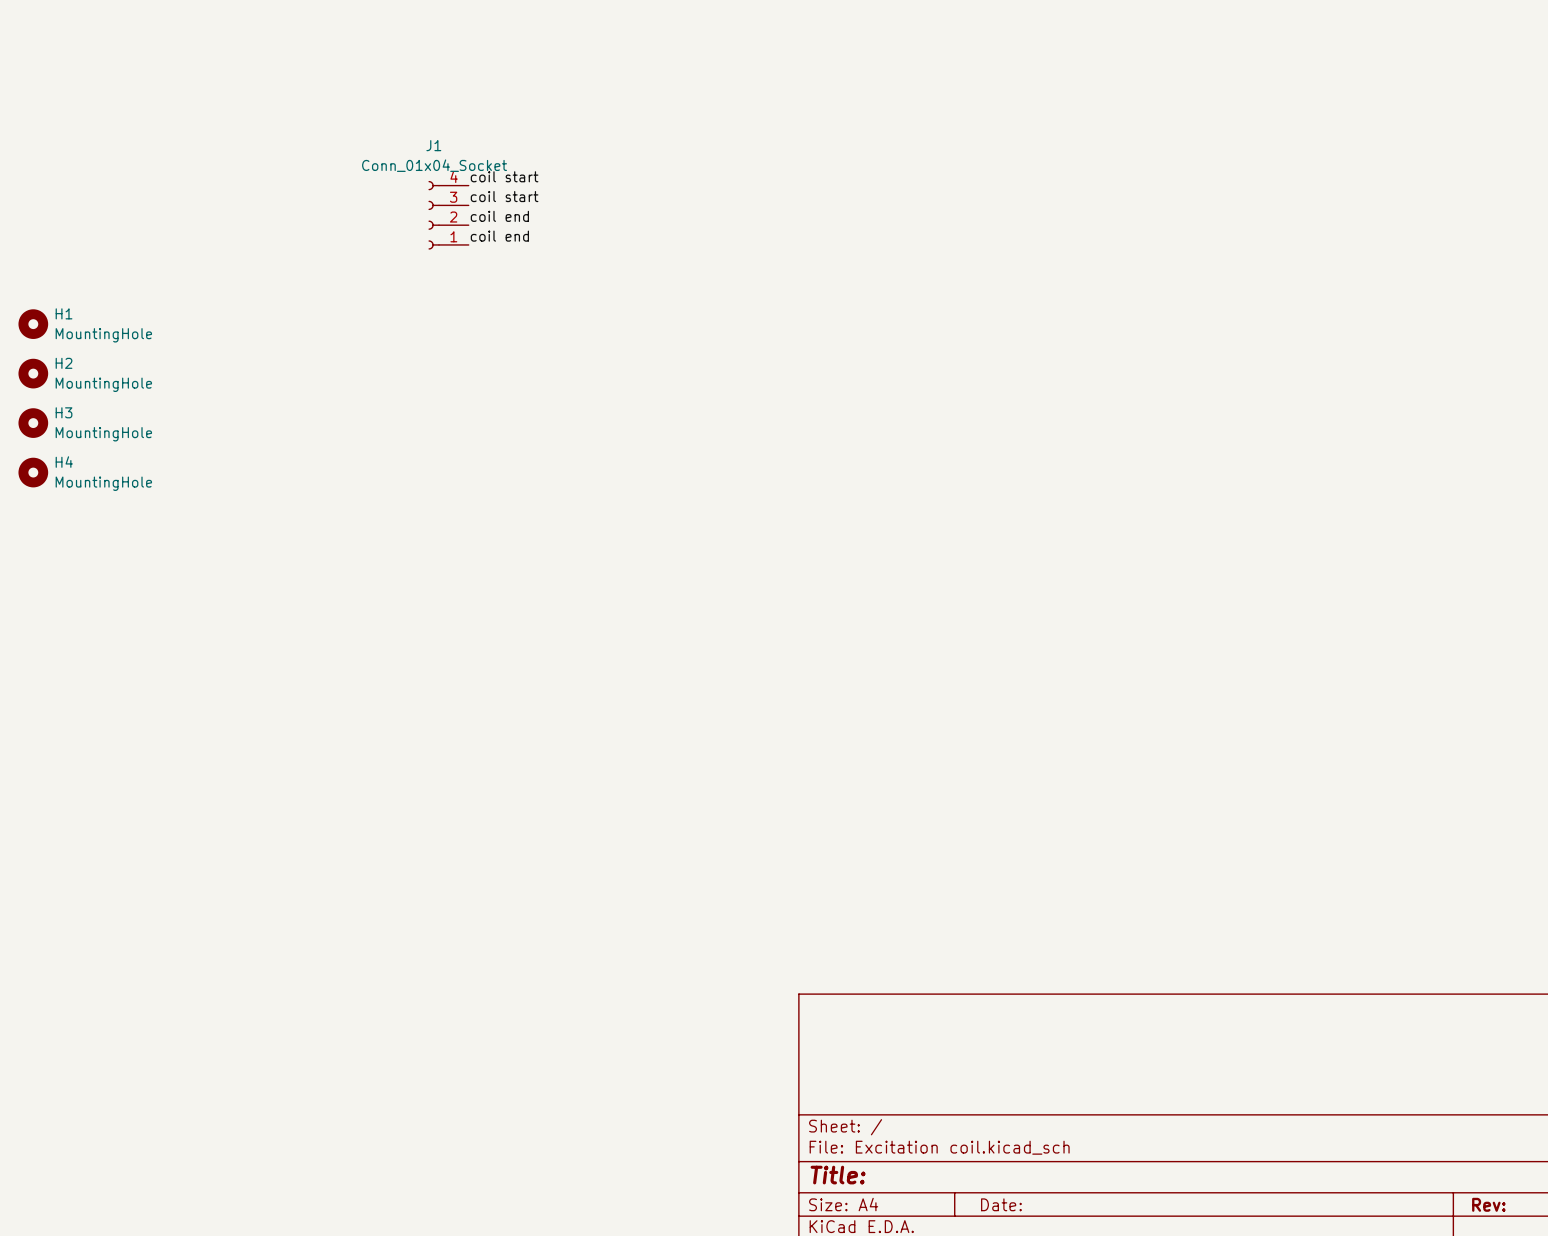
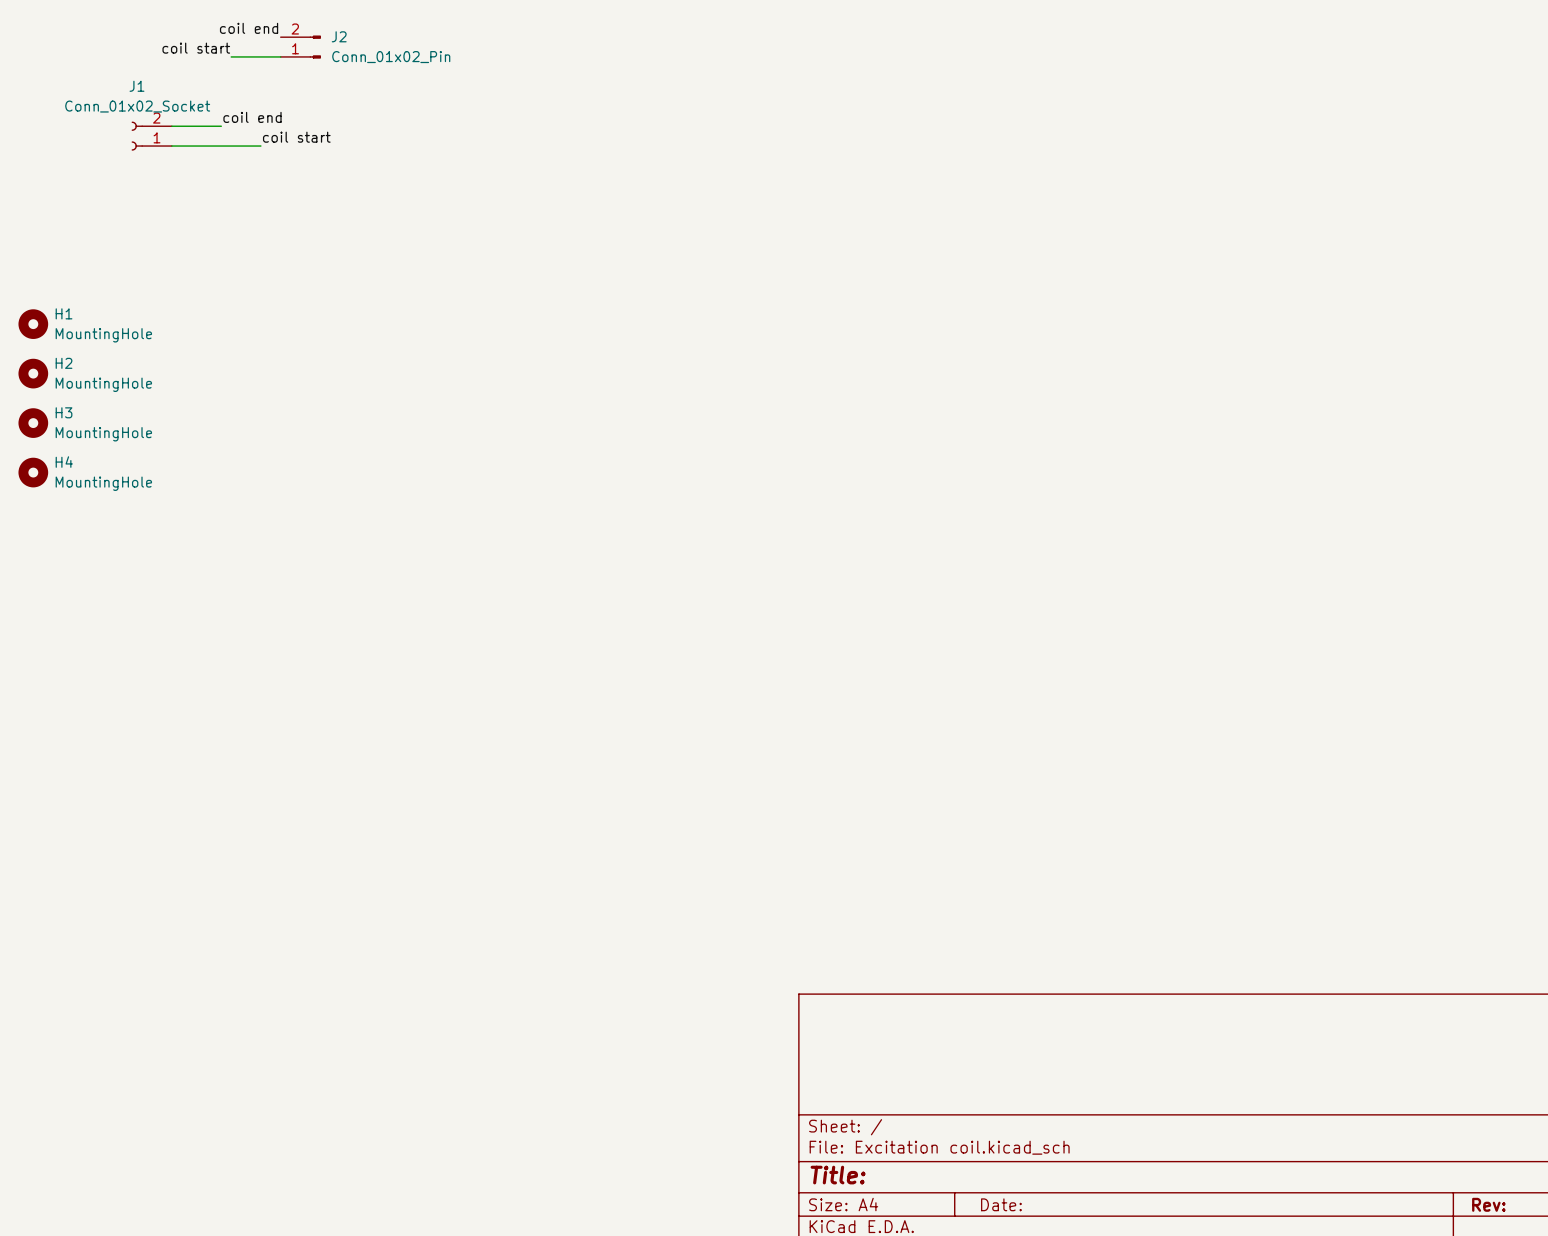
label: none -> coil end (249, 28)
J2: none -> Conn_01x02_Pin (300, 47)
label: none -> coil start (196, 48)
wire: none -> (231, 56) (280, 56)
label: none -> coil end (252, 117)
wire: none -> (171, 126) (221, 126)
label: none -> coil start (296, 137)
J1 name position: J1 (433, 145) -> J1 (136, 86)
wire: none -> (171, 146) (260, 146)
J1 value: Conn_01x04_Socket (434, 165) -> Conn_01x02_Socket (137, 106)
label: coil start (504, 176) -> none
J1 symbol: [428, 181, 469, 250] -> [131, 121, 172, 151]
label: coil start (504, 196) -> none
label: coil end (499, 216) -> none
label: coil end (499, 236) -> none

